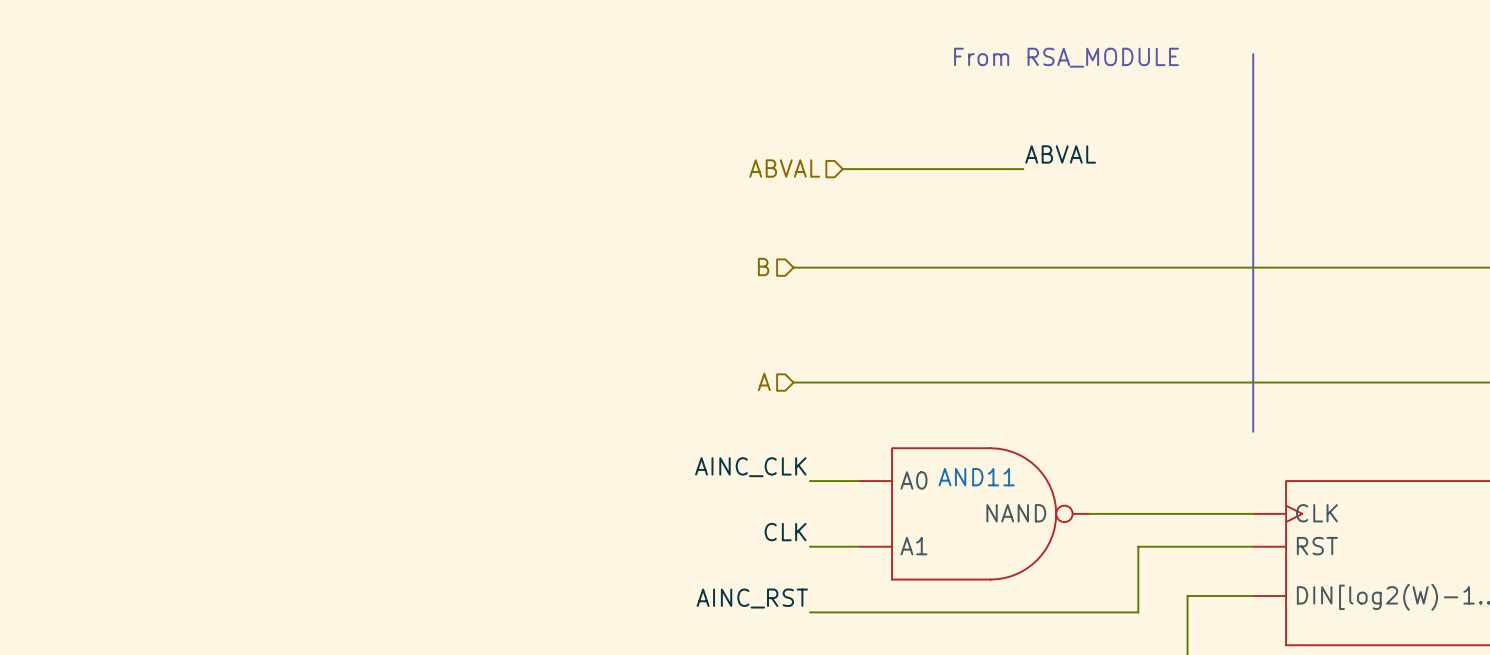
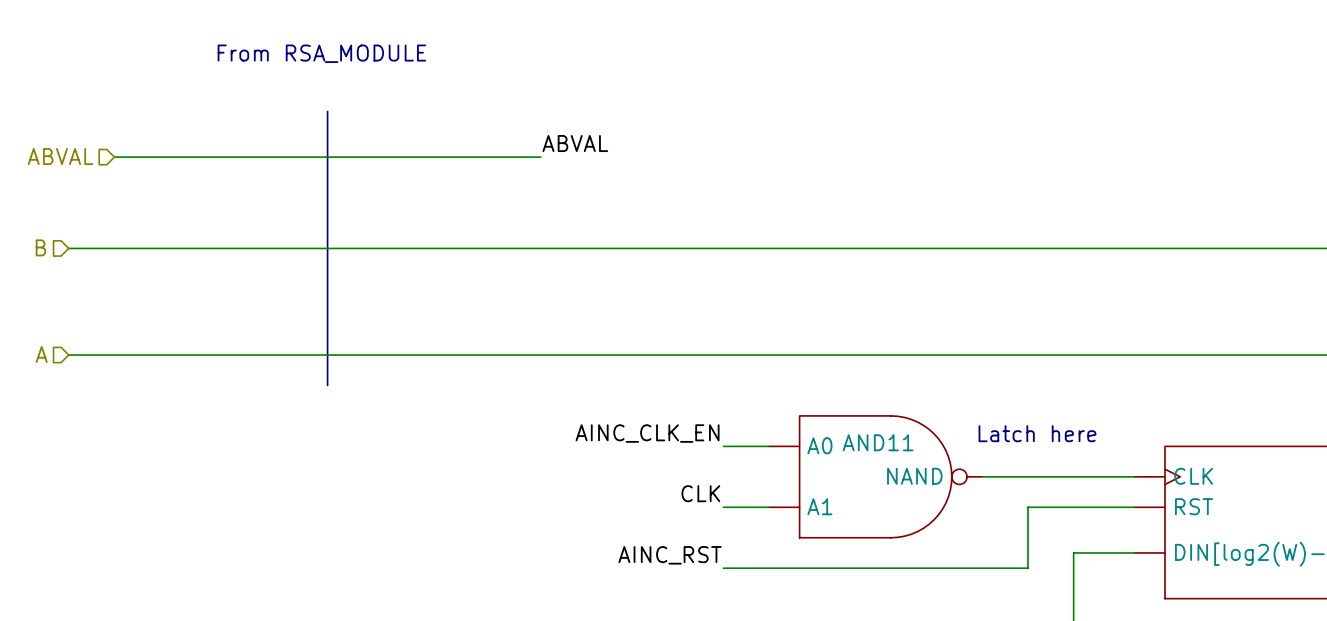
line: (1253, 54) (1253, 431) -> none
text: none -> From RSA_MODULE (321, 53)
text: From RSA_MODULE (1066, 57) -> none
line: none -> (327, 111) (327, 385)
label: none -> ABVAL (575, 143)
label: ABVAL (1060, 154) -> none
hierarchical label: none -> ABVAL (60, 156)
hierarchical label: ABVAL (784, 168) -> none
wire: none -> (114, 157) (540, 157)
wire: (842, 169) (1023, 169) -> none
hierarchical label: none -> B (40, 247)
wire: none -> (68, 248) (708, 248)
hierarchical label: B (763, 267) -> none
hierarchical label: none -> A (41, 354)
hierarchical label: A (764, 381) -> none
wire: none -> (68, 355) (708, 355)
label: AINC_CLK (750, 467) -> AINC_CLK_EN (647, 433)
text: none -> Latch here (1037, 433)

